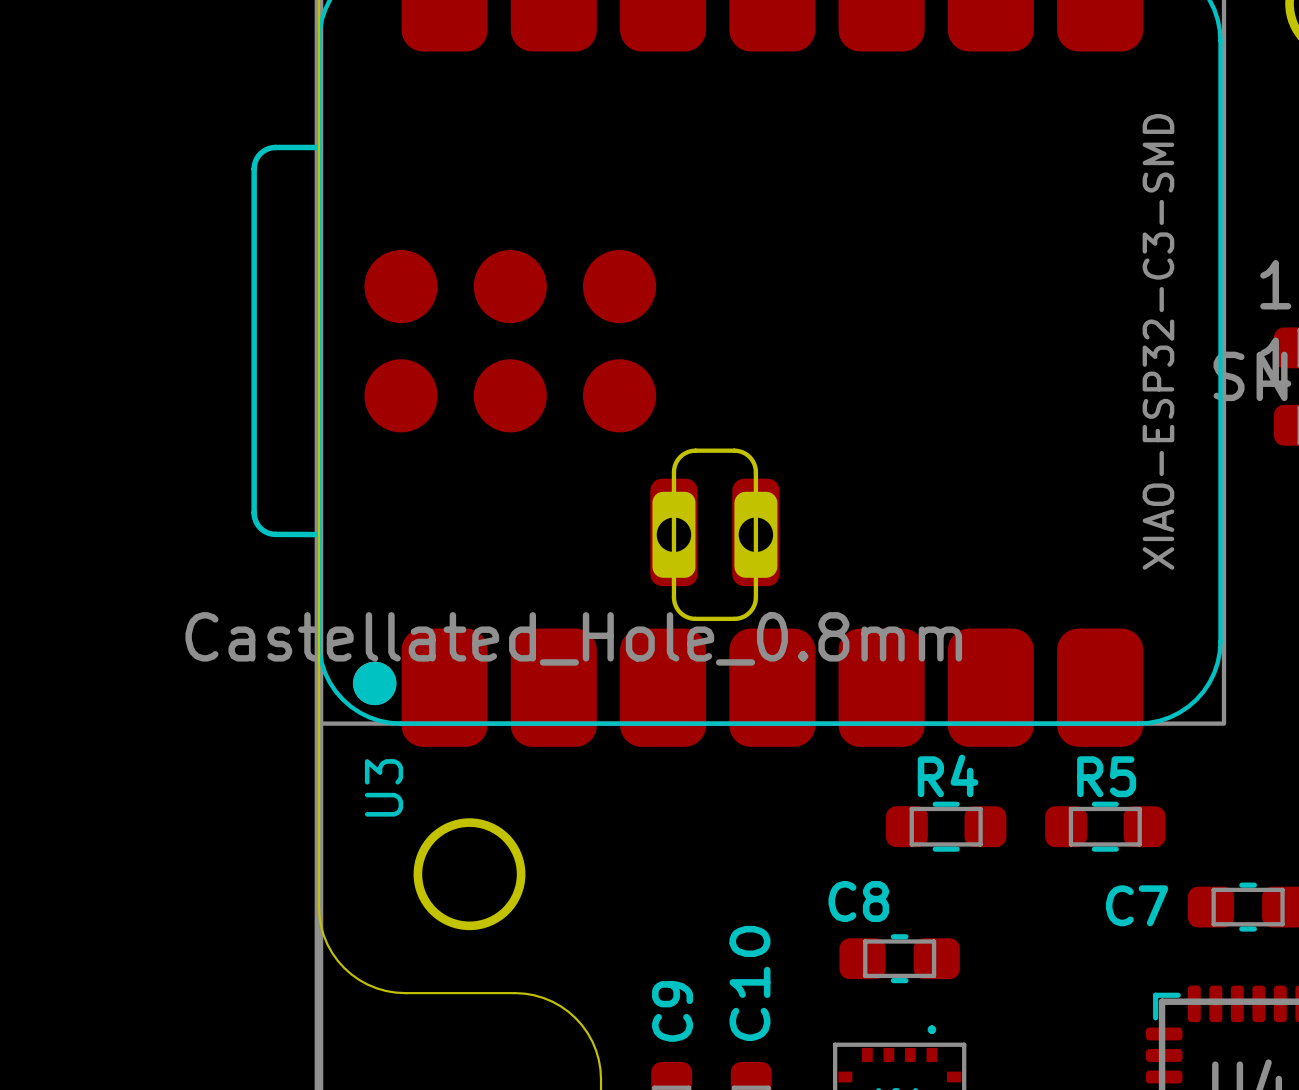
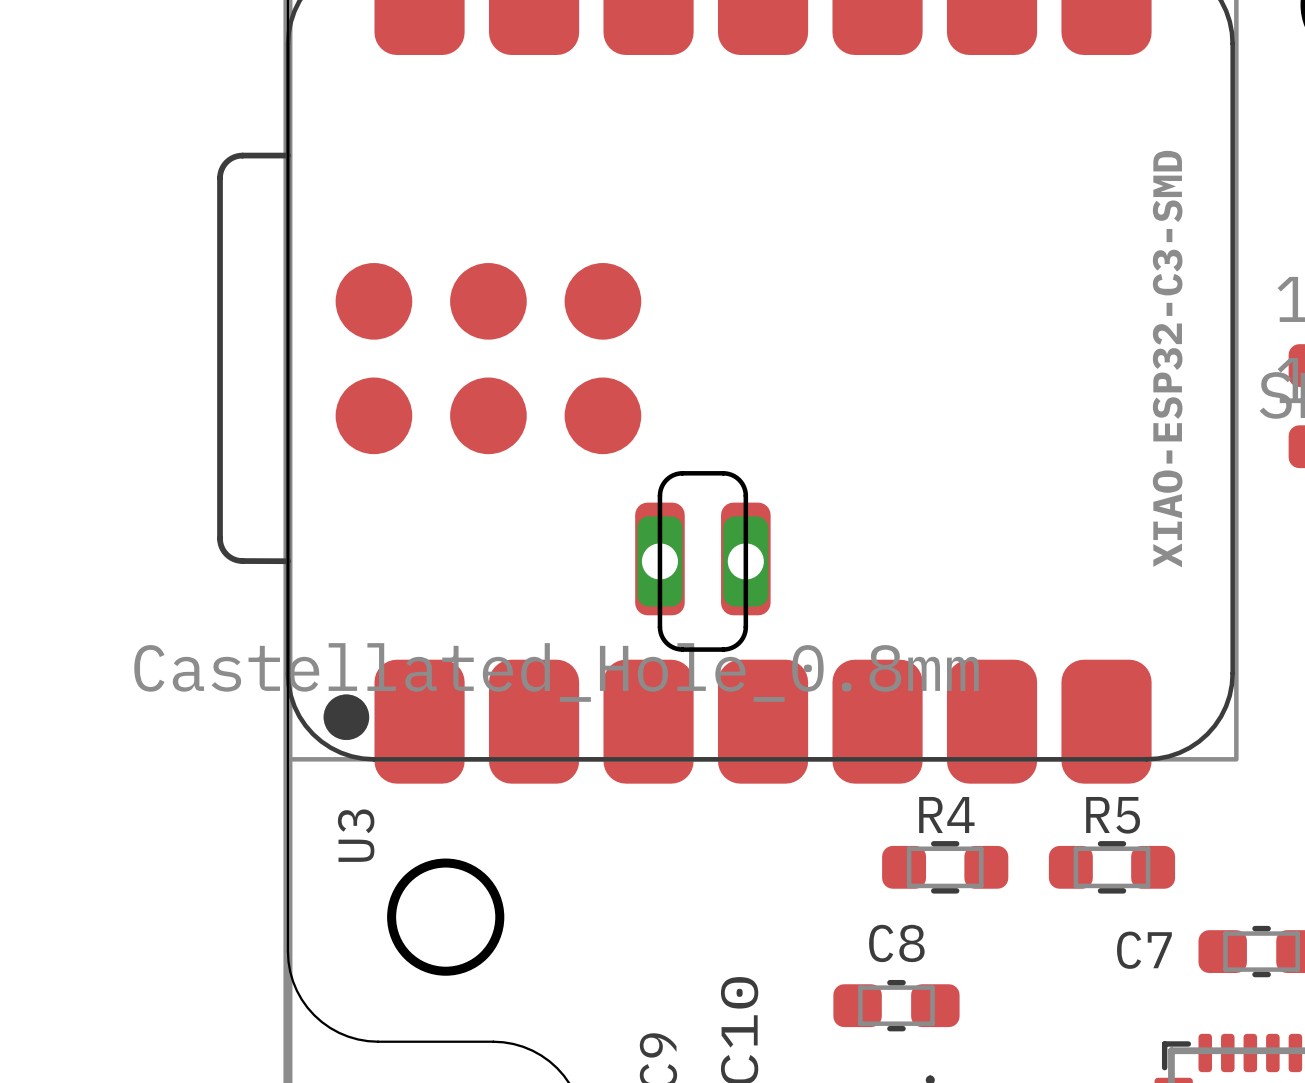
C8 name position: C8 (858, 901) -> C8 (896, 943)

